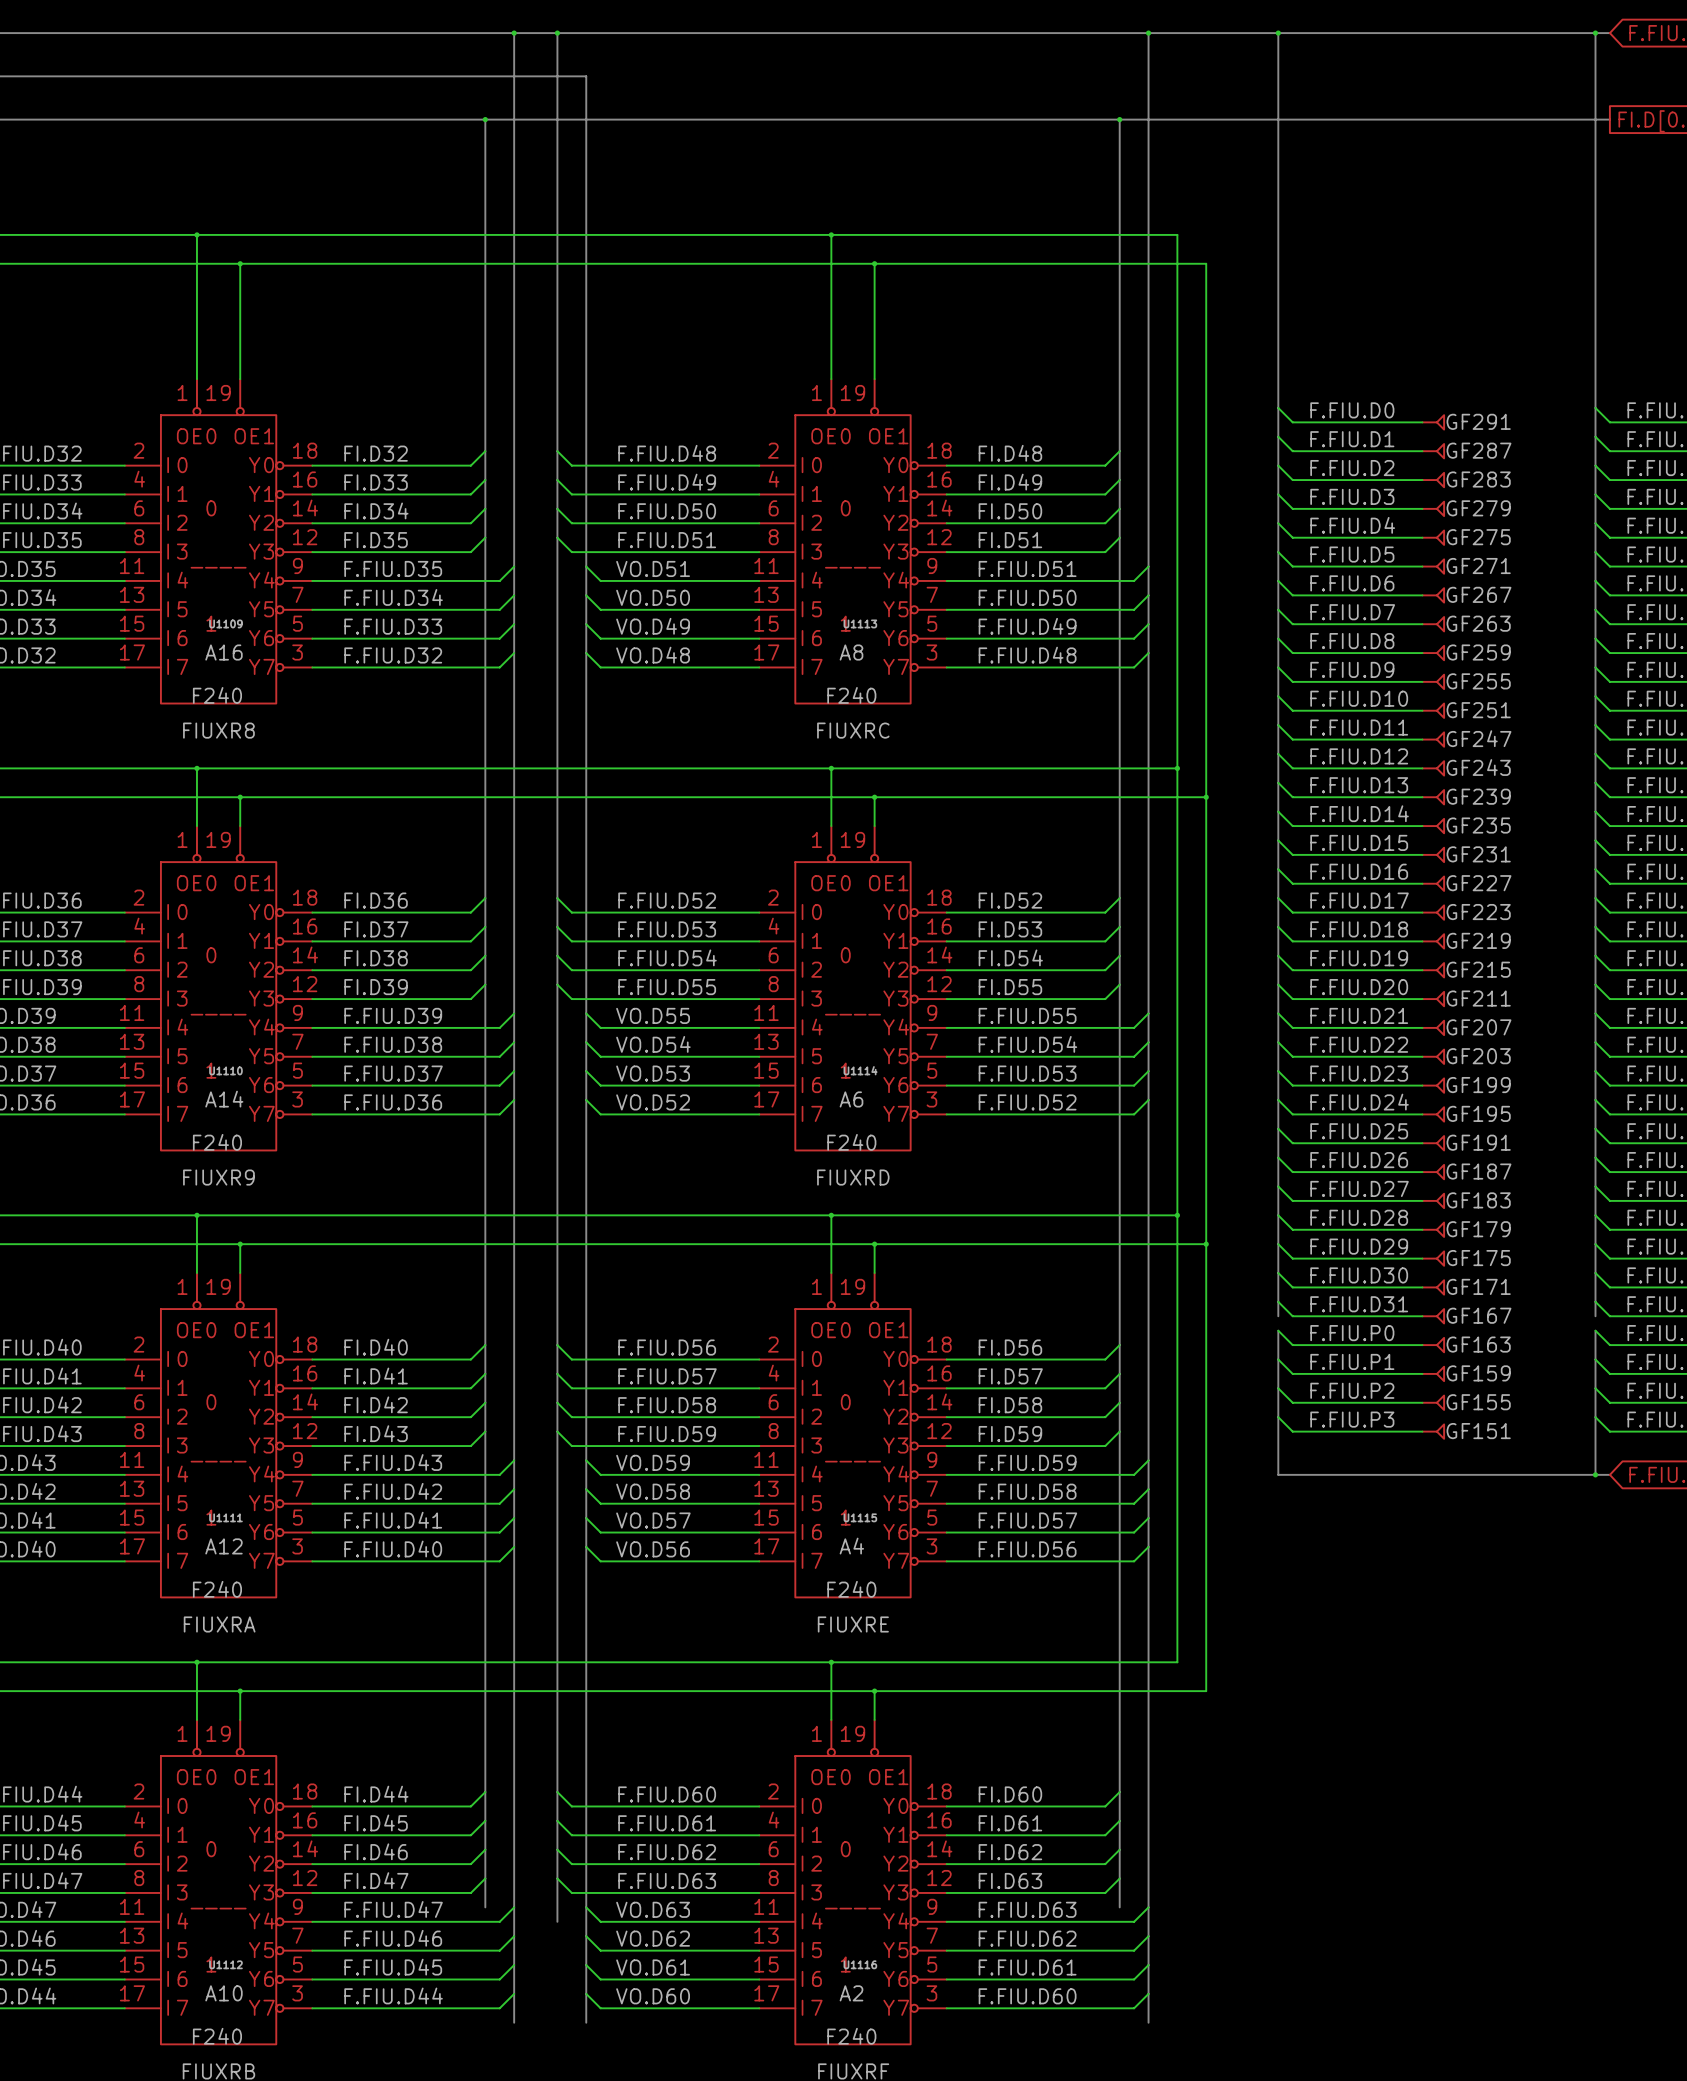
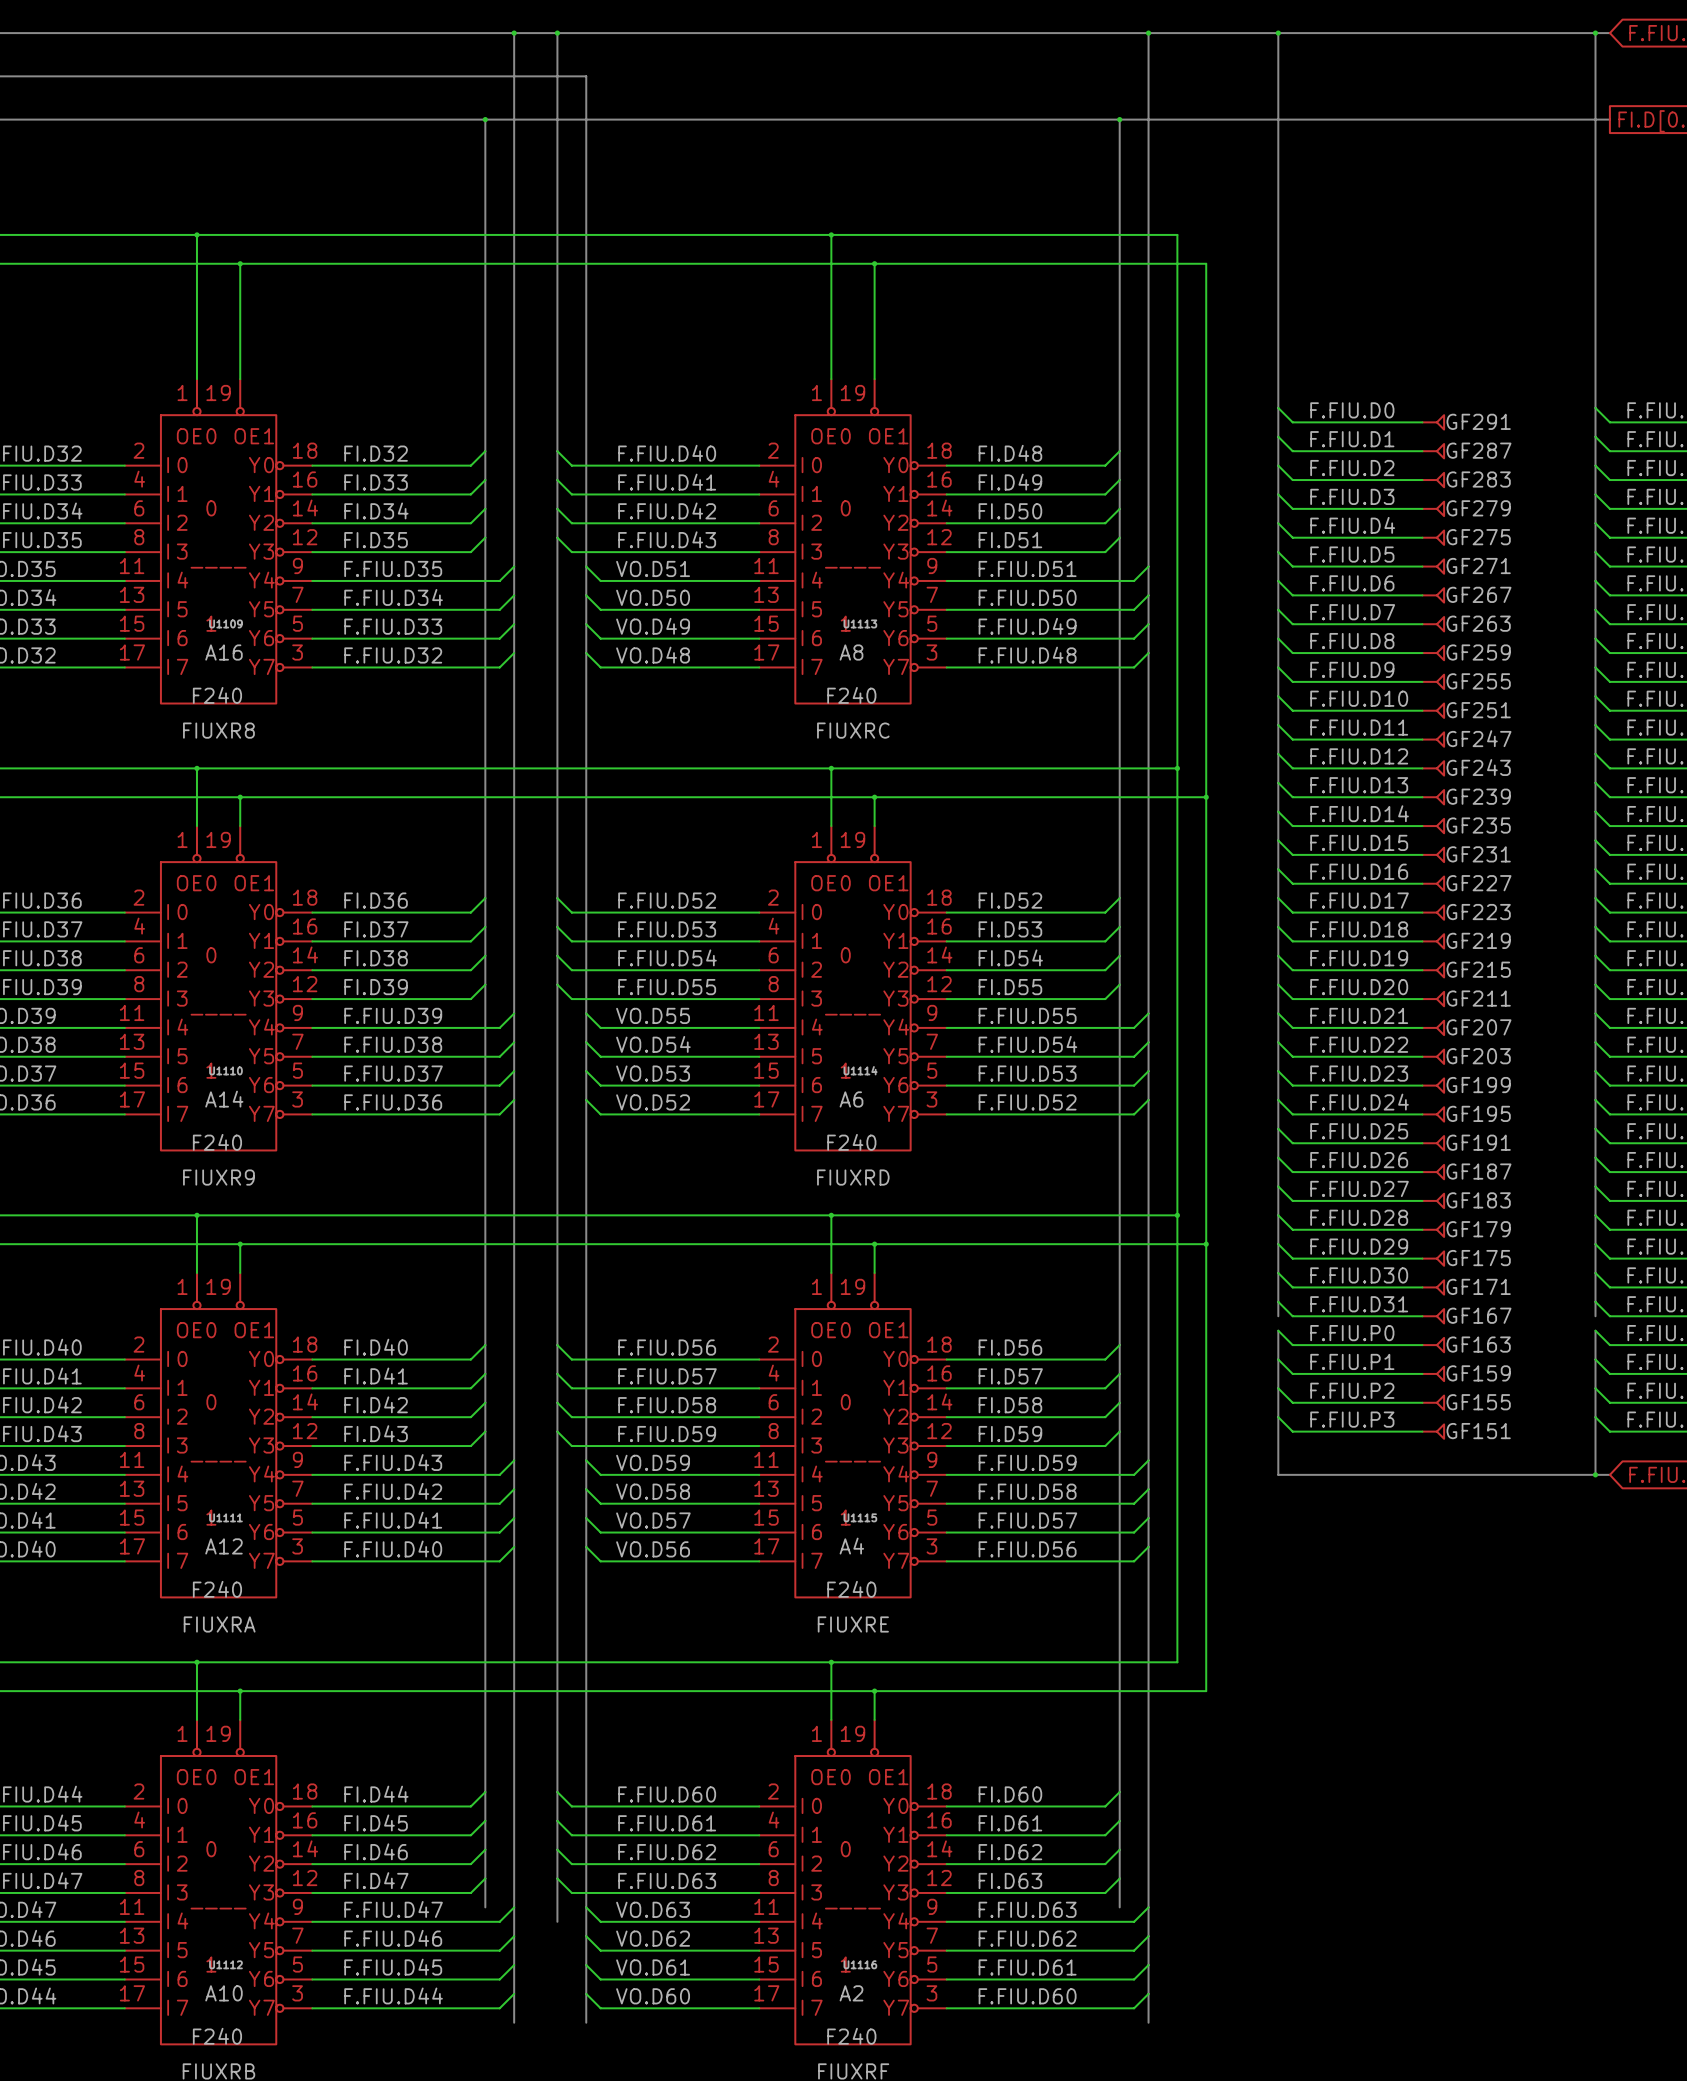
label: F.FIU.D48 (667, 453) -> F.FIU.D40 (667, 453)
label: F.FIU.D49 (667, 482) -> F.FIU.D41 (667, 482)
label: F.FIU.D50 (667, 511) -> F.FIU.D42 (667, 510)
label: F.FIU.D51 (667, 540) -> F.FIU.D43 (667, 539)

